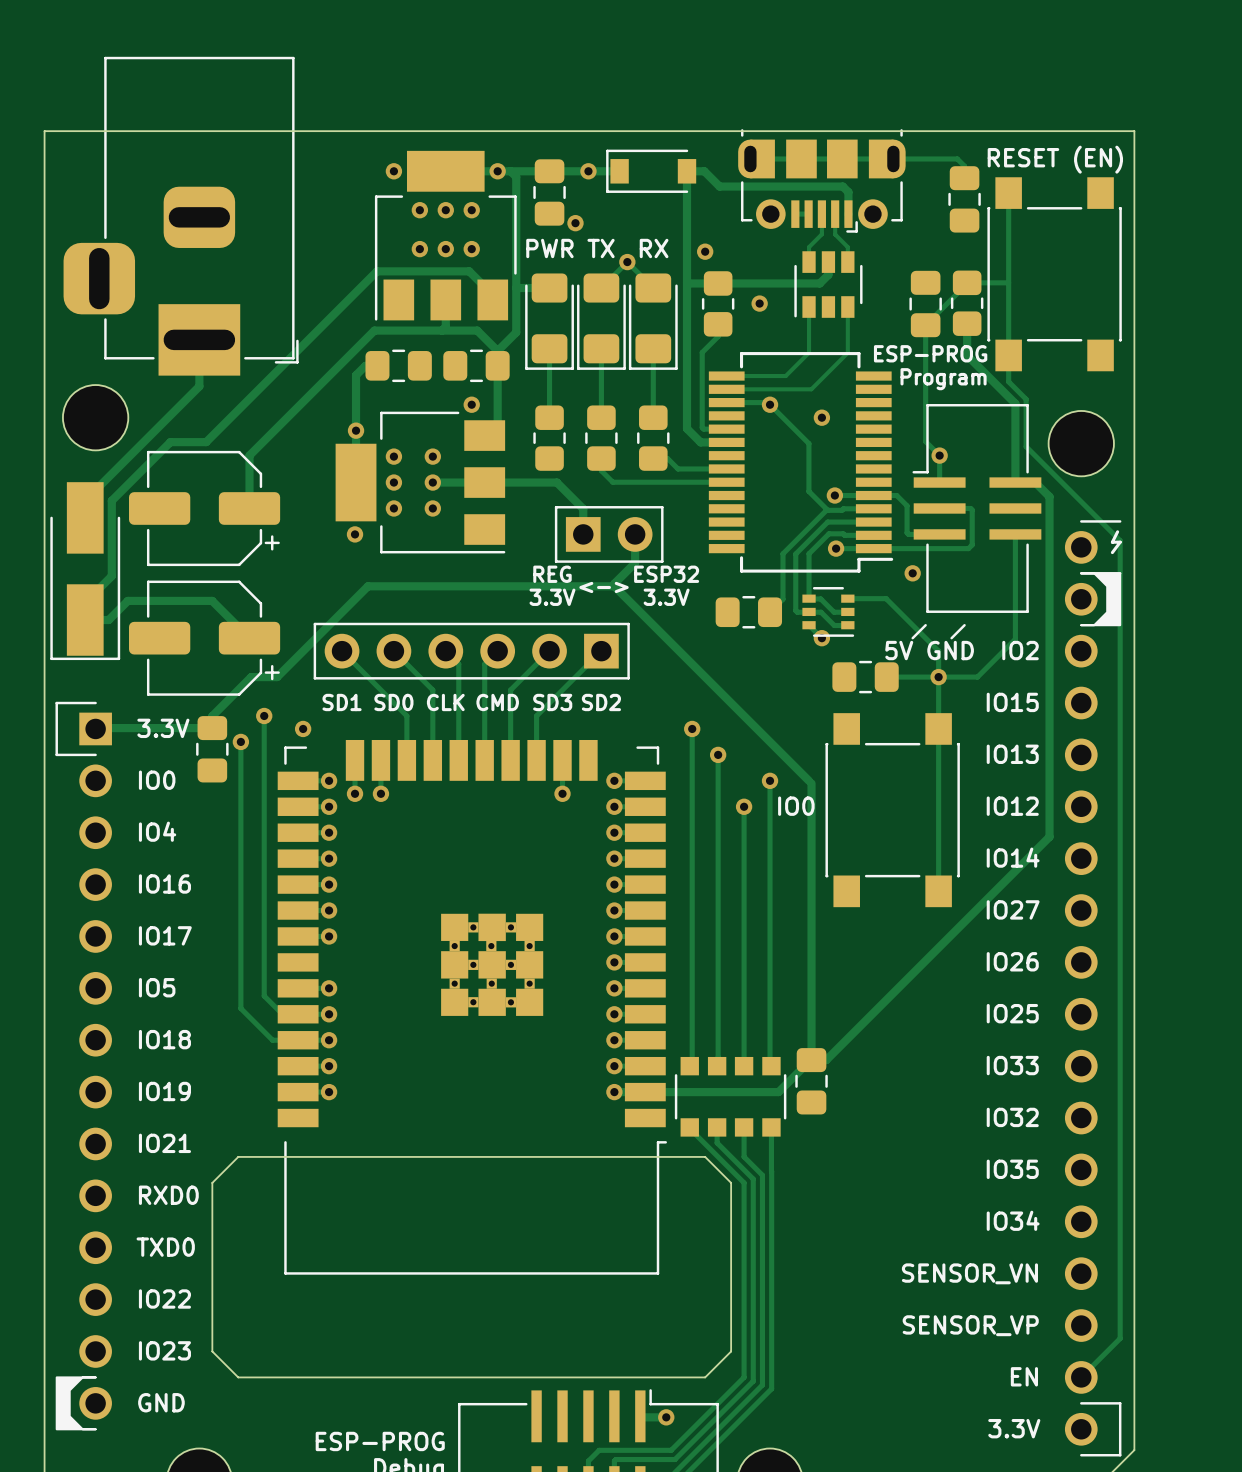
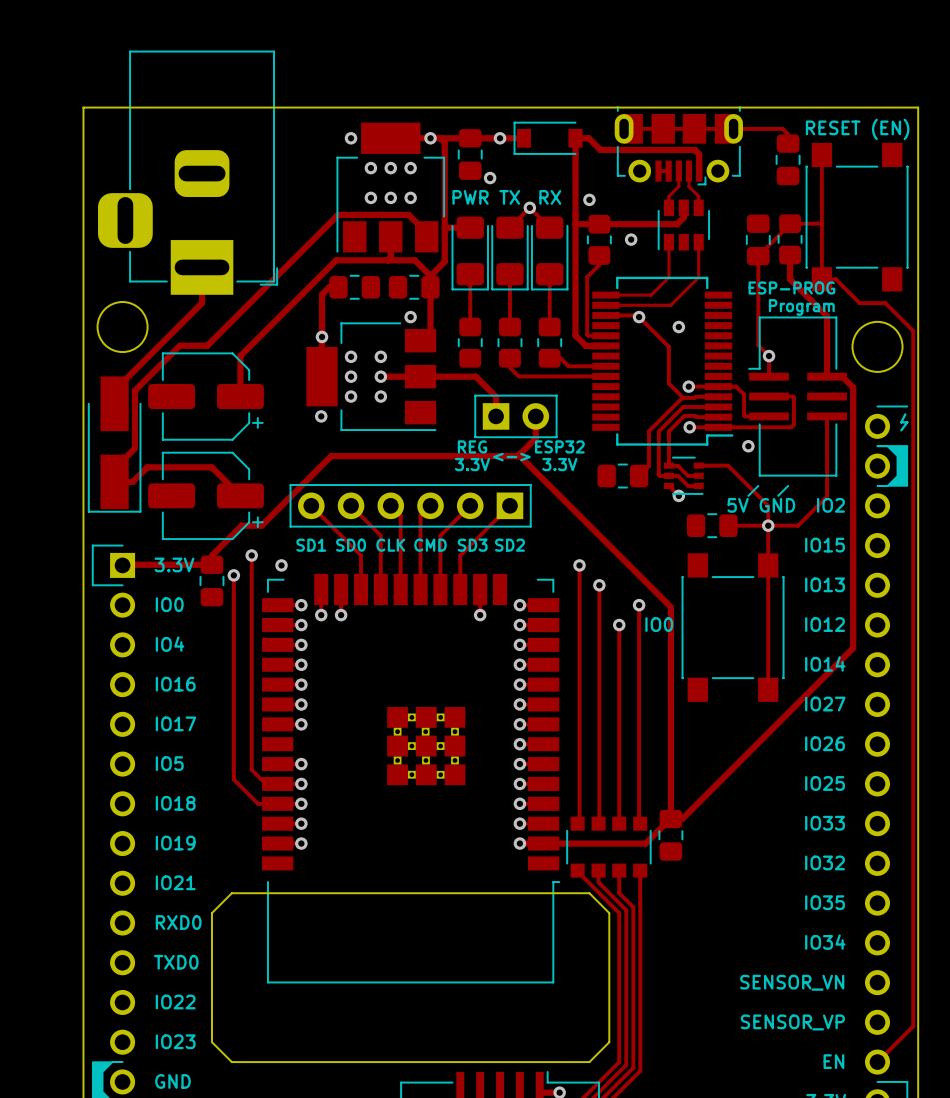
text position: ESP-PROG (930, 353) -> ESP-PROG (791, 288)
track: (1008, 355) (1008, 381) (1026, 399) (1026, 446) (1120, 540) (1120, 1338) -> (821, 279) (835, 279) (859, 303) (885, 303) (913, 330) (913, 1026) (907, 1032)
text position: Program (943, 379) -> Program (801, 307)

